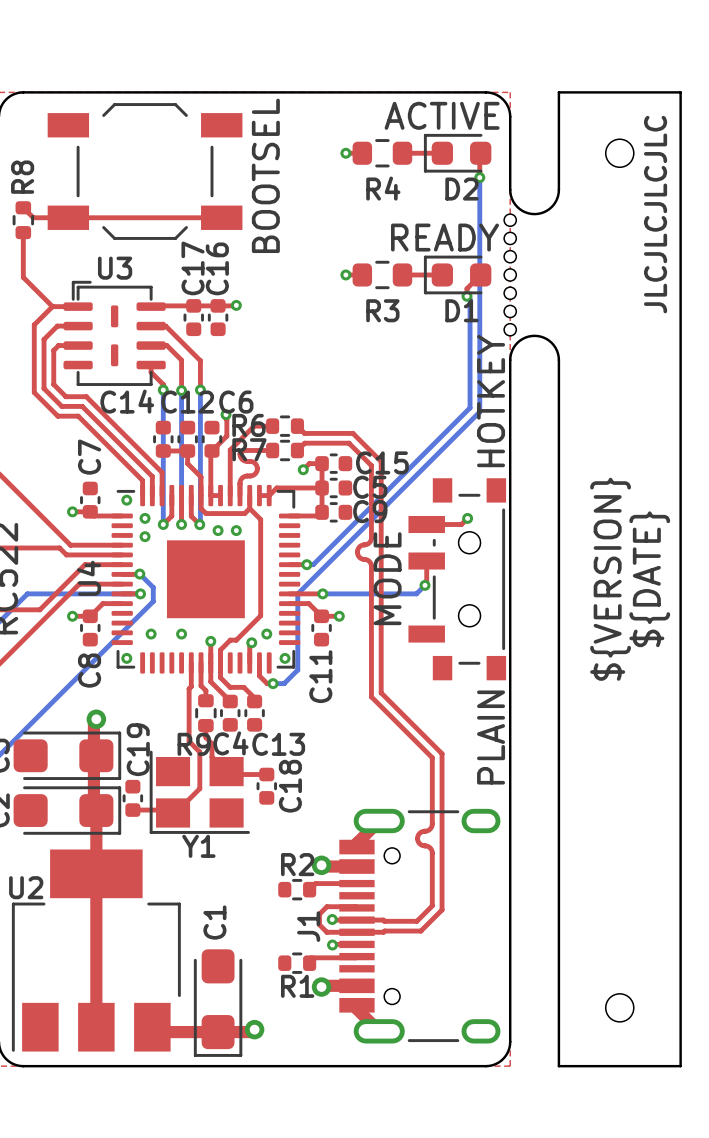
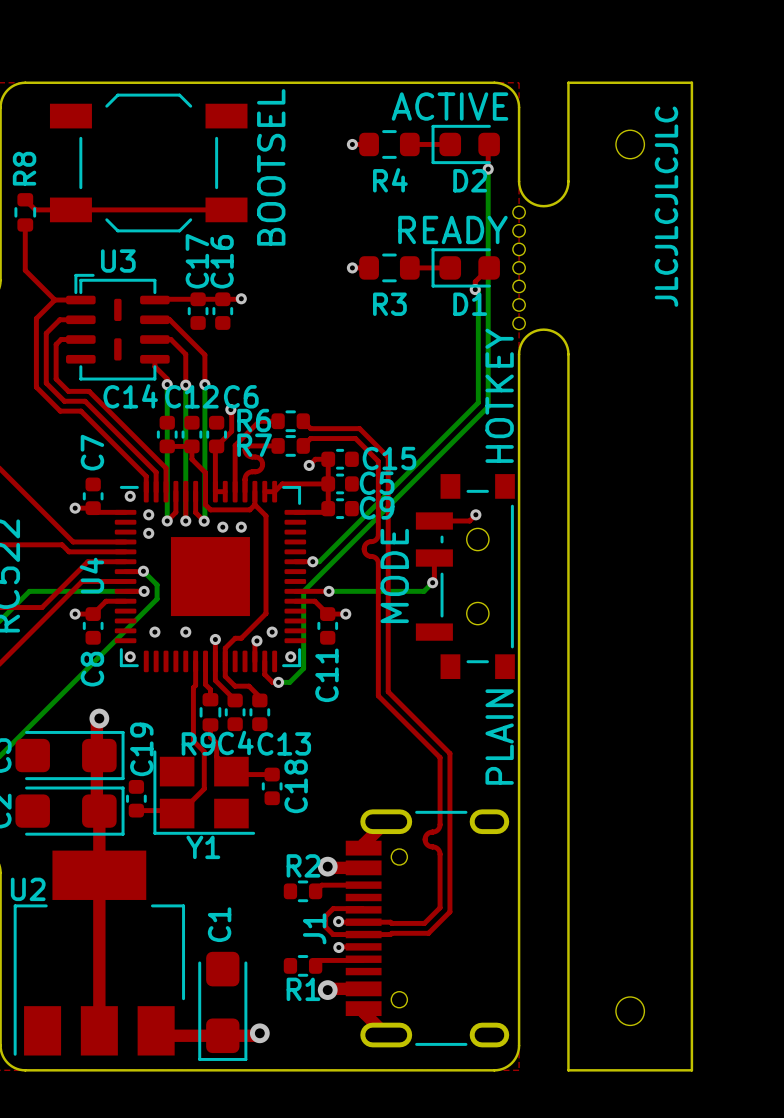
text: ${VERSION} (610, 579) -> none
text: ${DATE} (649, 579) -> none

